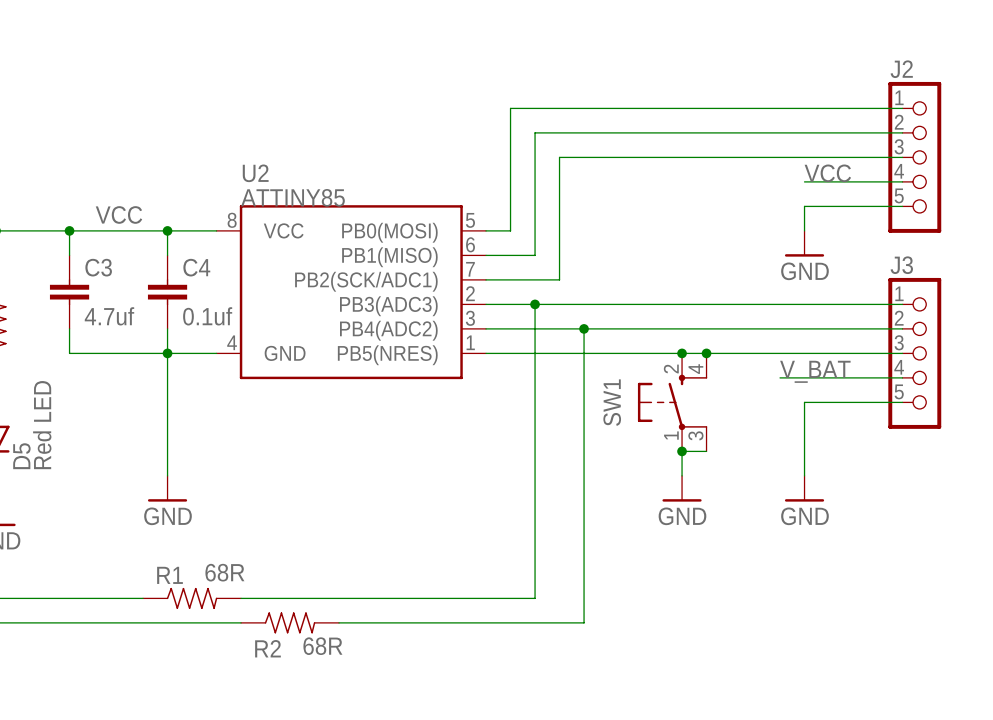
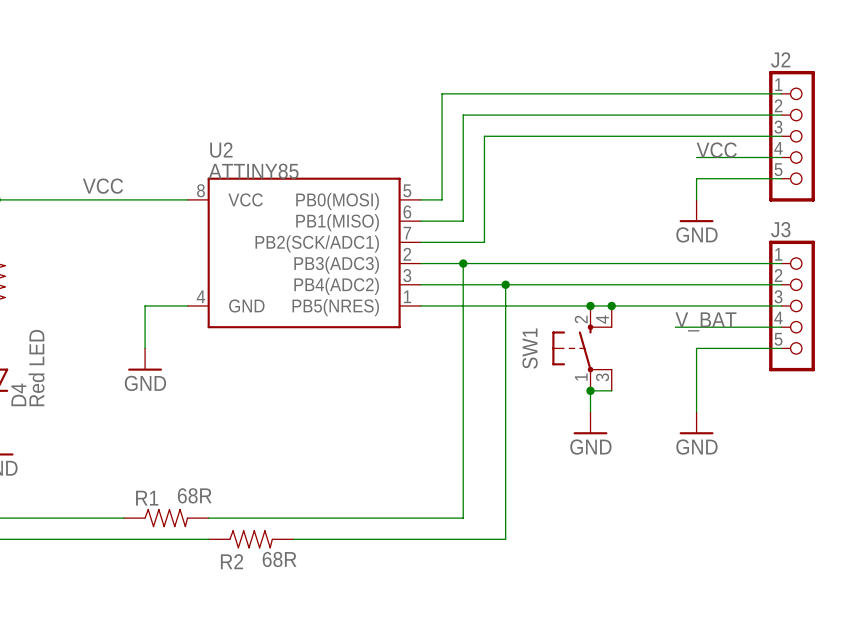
wire: (69, 230) (69, 255) -> none
junction: (69, 230) -> none
wire: (167, 230) (167, 255) -> none
junction: (167, 230) -> none
C3: 4.7uf (69, 292) -> none
C4: 0.1uf (167, 292) -> none
wire: (69, 328) (69, 353) (167, 353) (167, 328) -> none
junction: (167, 353) -> none
wire: (167, 402) (167, 475) -> none
D5 name: D5 (21, 456) -> D4 (18, 394)
power symbol position: GND (167, 488) -> GND (145, 359)

